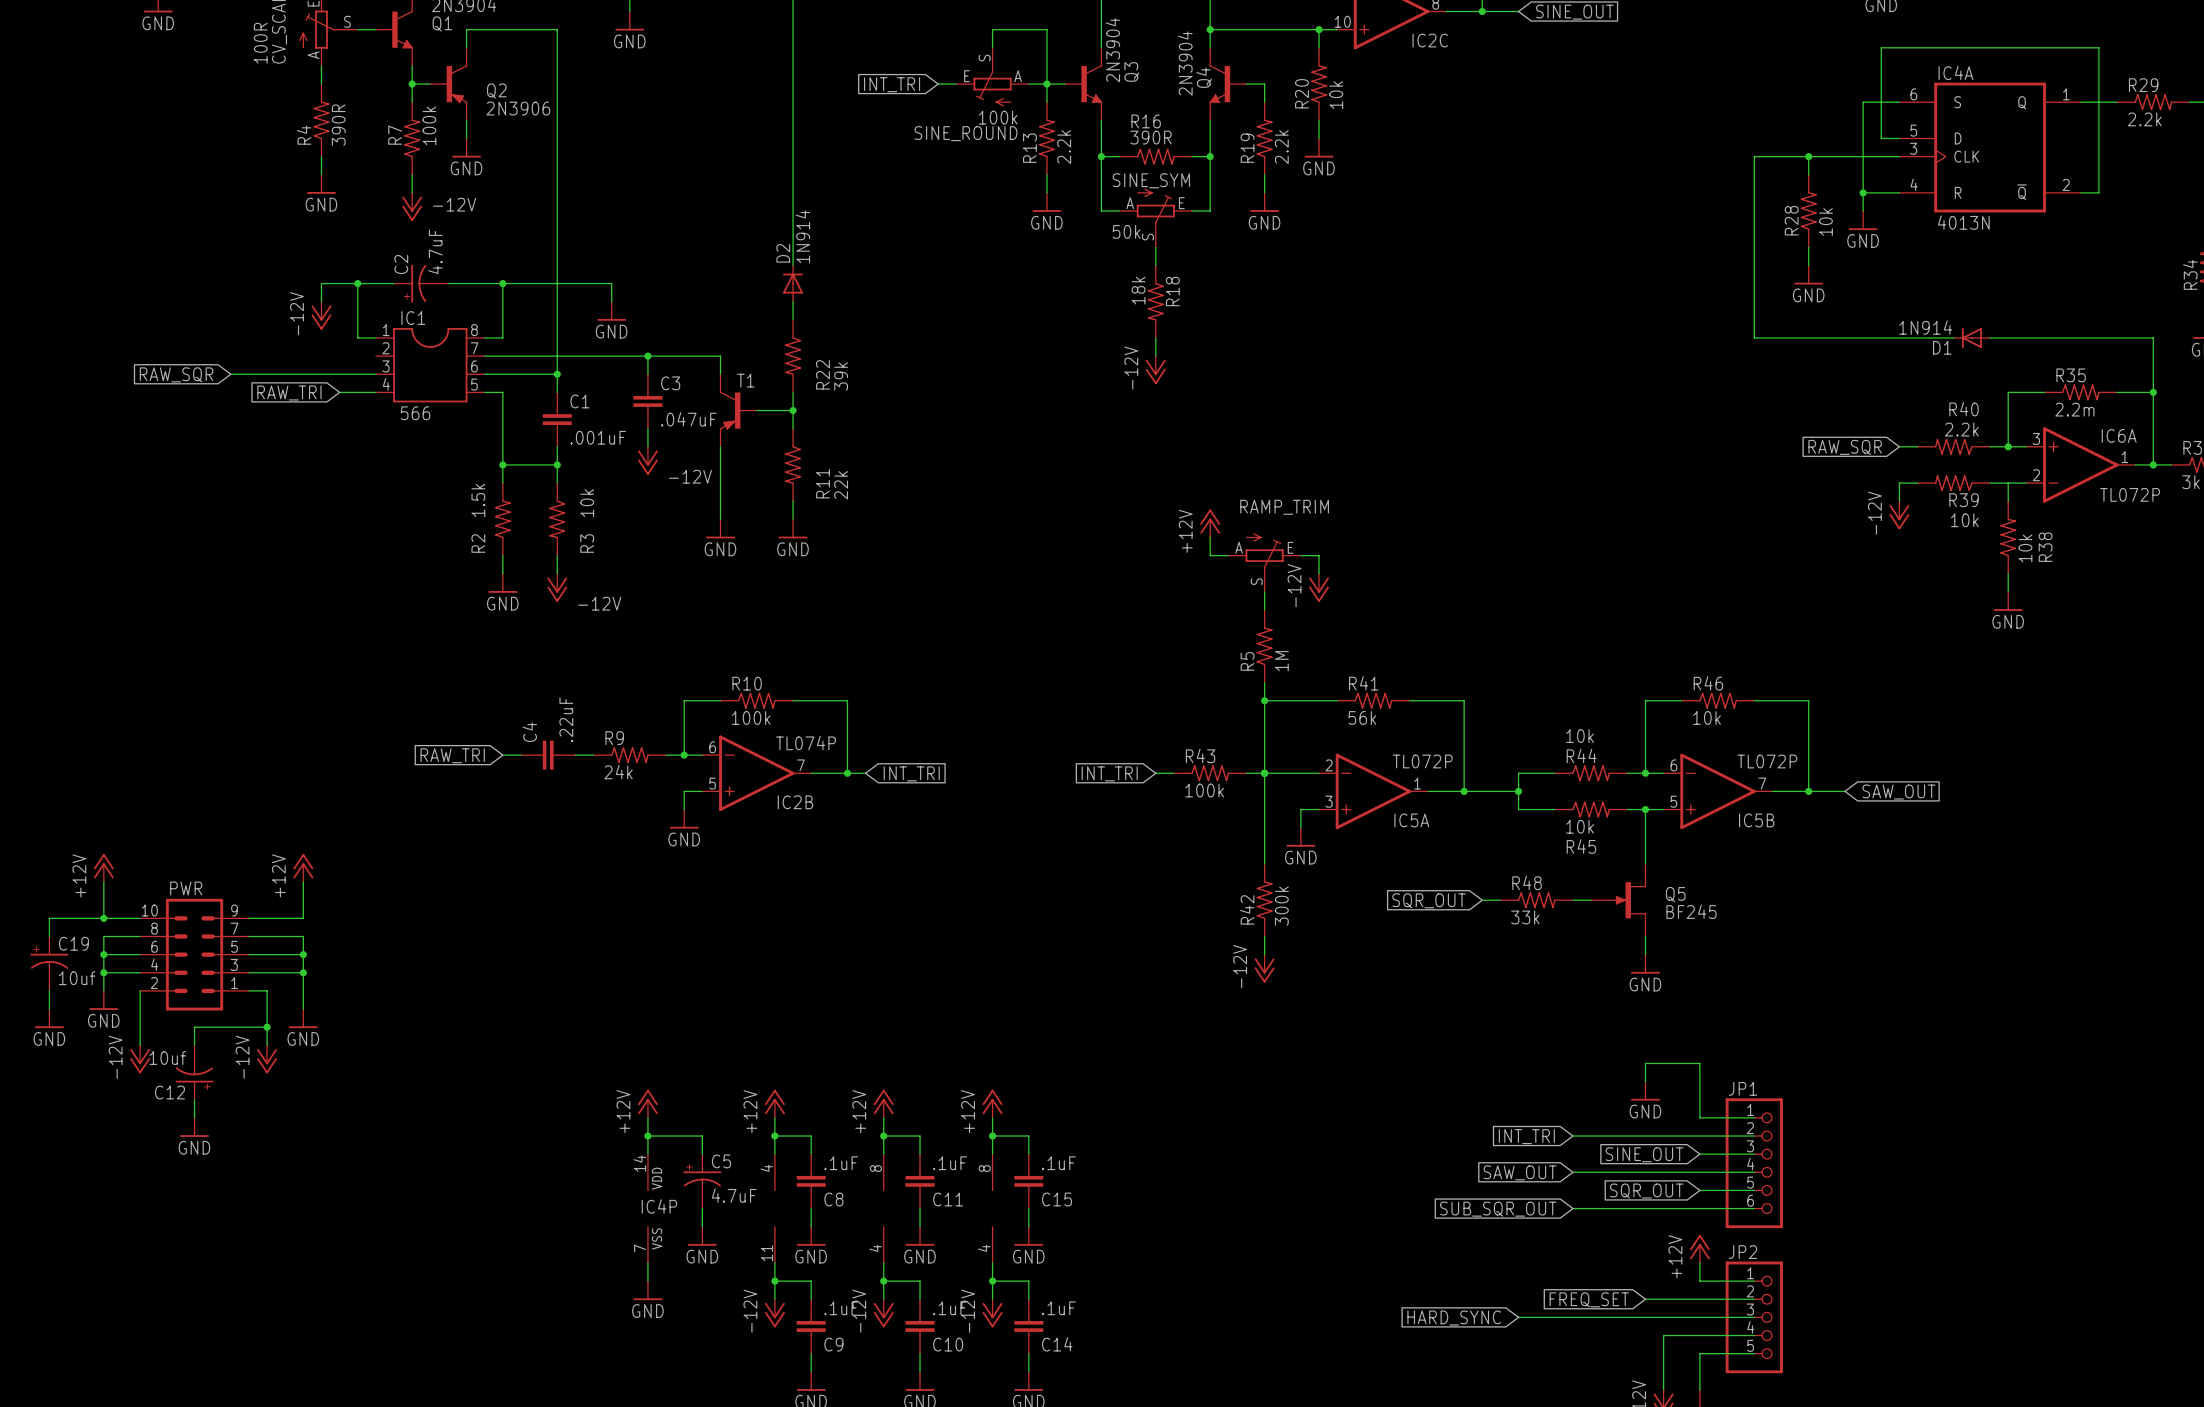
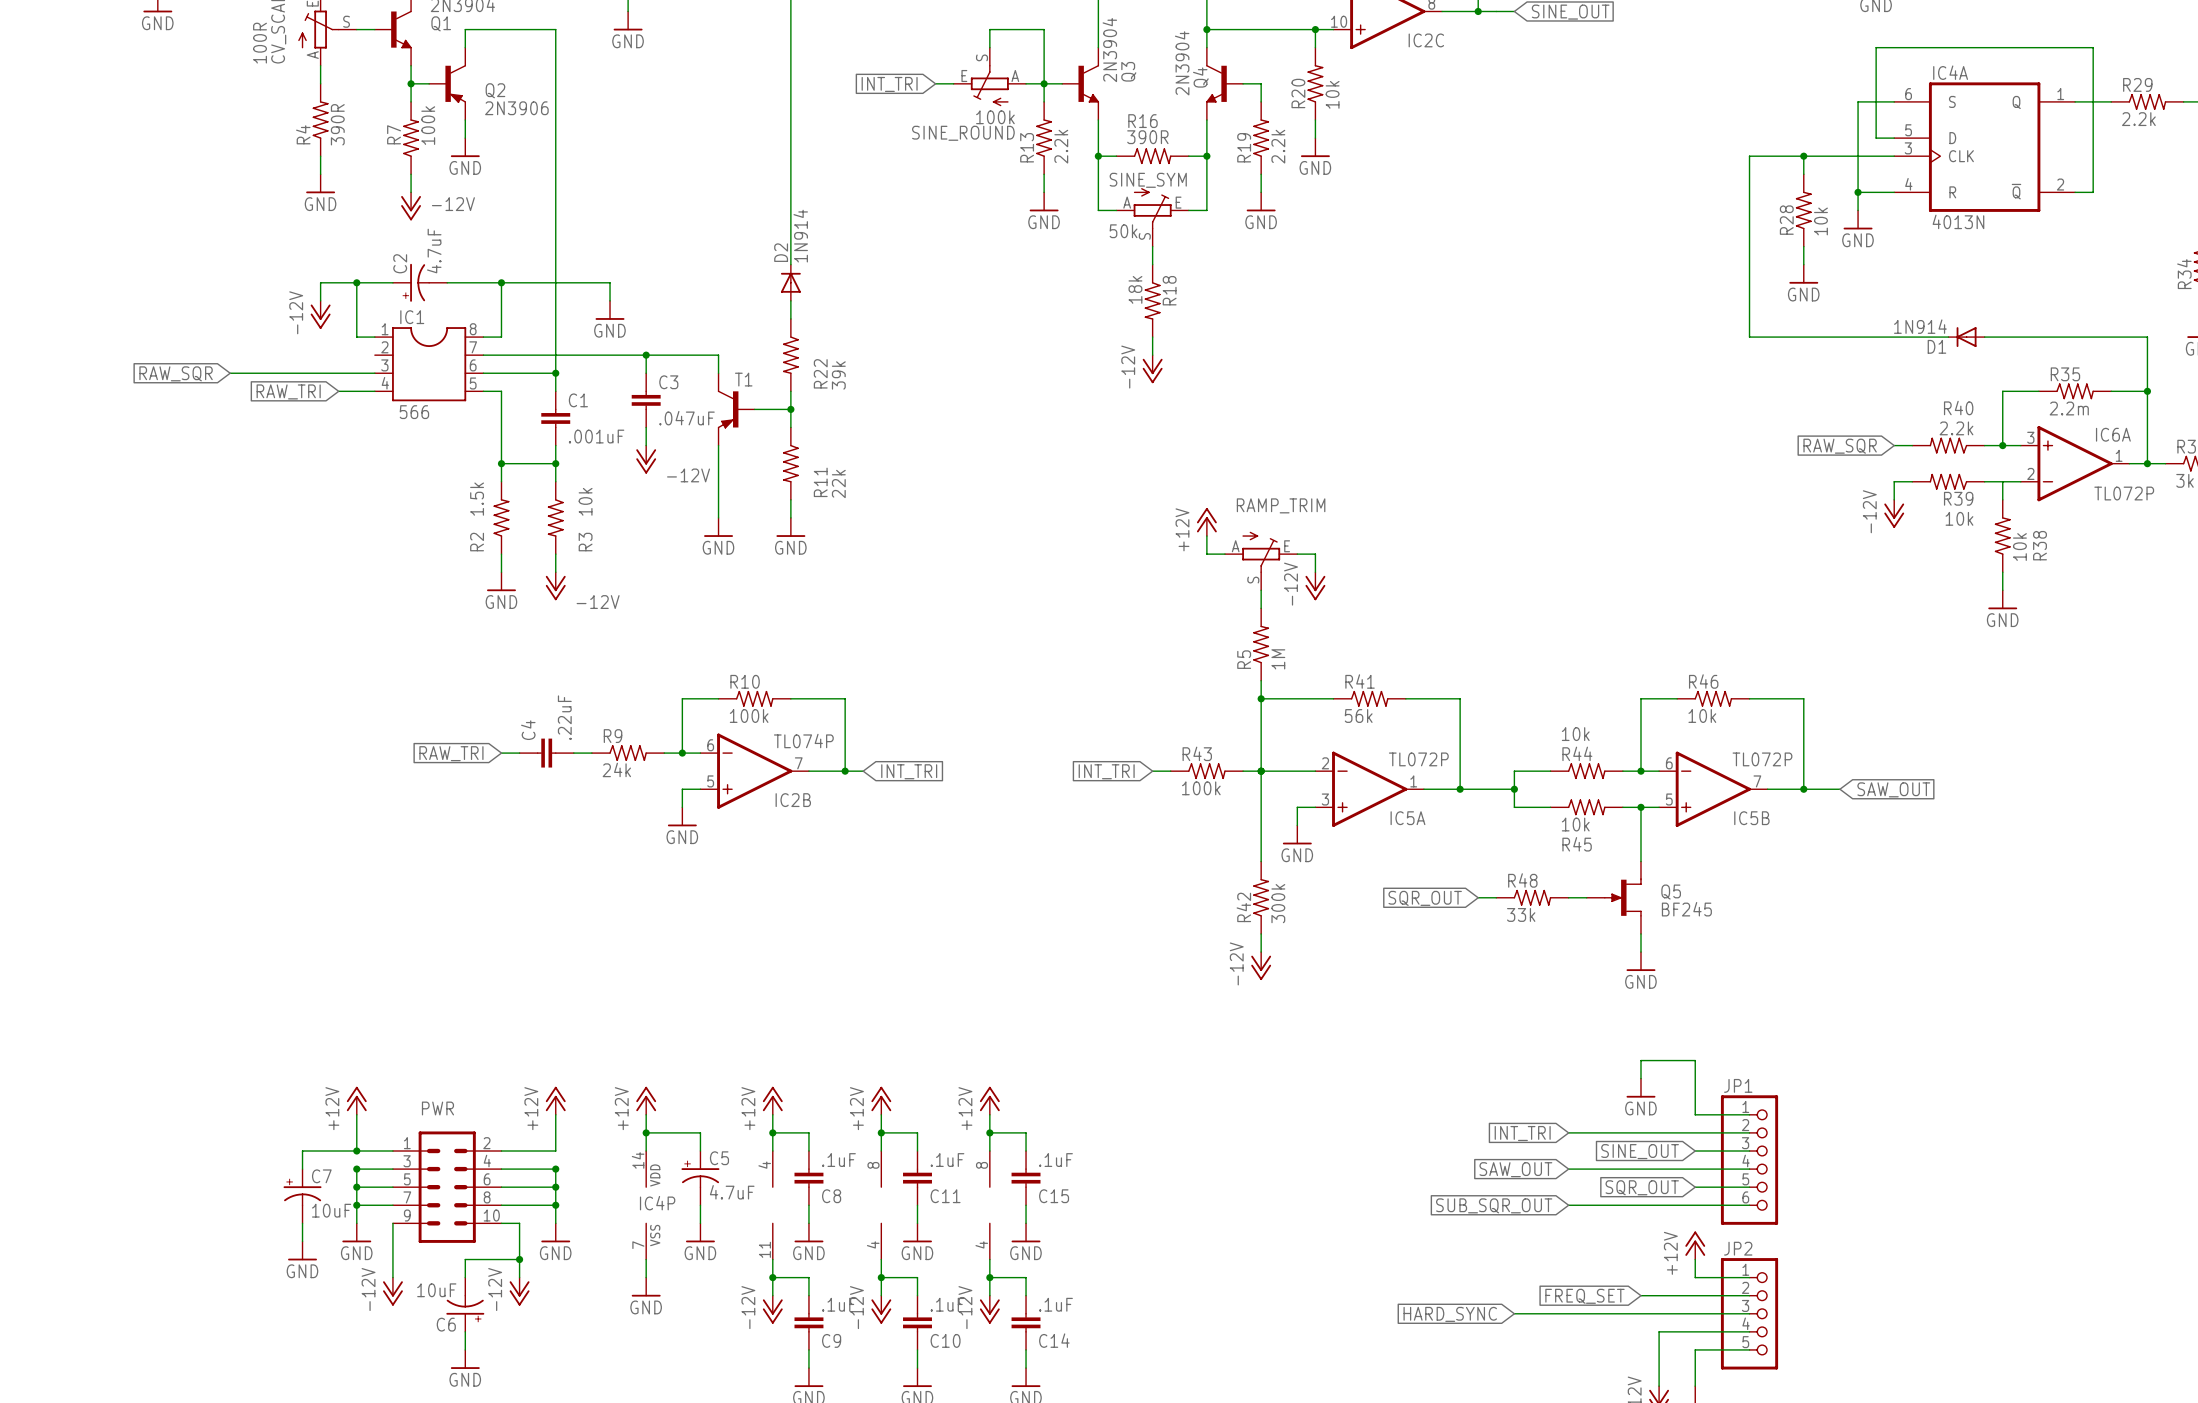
power symbol: +12V (103, 868) -> none
power symbol: +12V (303, 868) -> none
wire: (103, 882) (103, 918) -> none
wire: (303, 882) (303, 918) (248, 918) -> none
junction: (103, 918) -> none
wire: (140, 918) (49, 918) (49, 936) -> none
wire: (140, 936) (103, 936) (103, 990) -> none
wire: (248, 936) (303, 936) (303, 1009) -> none
wire: (103, 954) (140, 954) -> none
junction: (103, 954) -> none
PWR: (194, 954) -> none
wire: (248, 954) (303, 954) -> none
junction: (303, 954) -> none
C19: 10uf (49, 963) -> none
wire: (103, 972) (140, 972) -> none
junction: (103, 972) -> none
wire: (248, 972) (303, 972) -> none
junction: (303, 972) -> none
wire: (49, 990) (49, 1009) -> none
wire: (140, 990) (140, 1045) -> none
wire: (248, 990) (267, 990) (267, 1045) -> none
power symbol: GND (103, 1000) -> none
power symbol: GND (49, 1018) -> none
power symbol: GND (303, 1018) -> none
wire: (267, 1027) (194, 1027) (194, 1045) -> none
junction: (267, 1027) -> none
power symbol: -12V (140, 1059) -> none
power symbol: -12V (267, 1059) -> none
C12: 10uf (194, 1072) -> none
wire: (194, 1099) (194, 1117) -> (302, 1223) (302, 1241)
power symbol: none -> +12V (356, 1100)
power symbol: none -> +12V (555, 1100)
wire: none -> (356, 1114) (356, 1151)
wire: none -> (555, 1114) (555, 1151) (501, 1151)
power symbol: GND (194, 1127) -> none
junction: none -> (356, 1151)
wire: none -> (392, 1151) (302, 1151) (302, 1169)
junction: none -> (356, 1169)
wire: none -> (392, 1169) (356, 1169) (356, 1223)
wire: none -> (501, 1169) (555, 1169) (555, 1223)
junction: none -> (555, 1169)
wire: none -> (356, 1187) (392, 1187)
junction: none -> (356, 1187)
PWR: none -> (447, 1187)
wire: none -> (501, 1187) (555, 1187)
junction: none -> (555, 1187)
C7: none -> 10uF (302, 1196)
wire: none -> (356, 1205) (392, 1205)
junction: none -> (356, 1205)
wire: none -> (501, 1205) (555, 1205)
junction: none -> (555, 1205)
wire: none -> (392, 1223) (392, 1277)
wire: none -> (501, 1223) (519, 1223) (519, 1277)
power symbol: none -> GND (356, 1232)
power symbol: none -> GND (555, 1232)
power symbol: none -> GND (302, 1250)
wire: none -> (519, 1259) (465, 1259) (465, 1277)
junction: none -> (519, 1259)
power symbol: none -> -12V (392, 1291)
power symbol: none -> -12V (519, 1291)
C6: none -> 10uF (465, 1304)
wire: none -> (465, 1331) (465, 1349)
power symbol: none -> GND (465, 1359)

